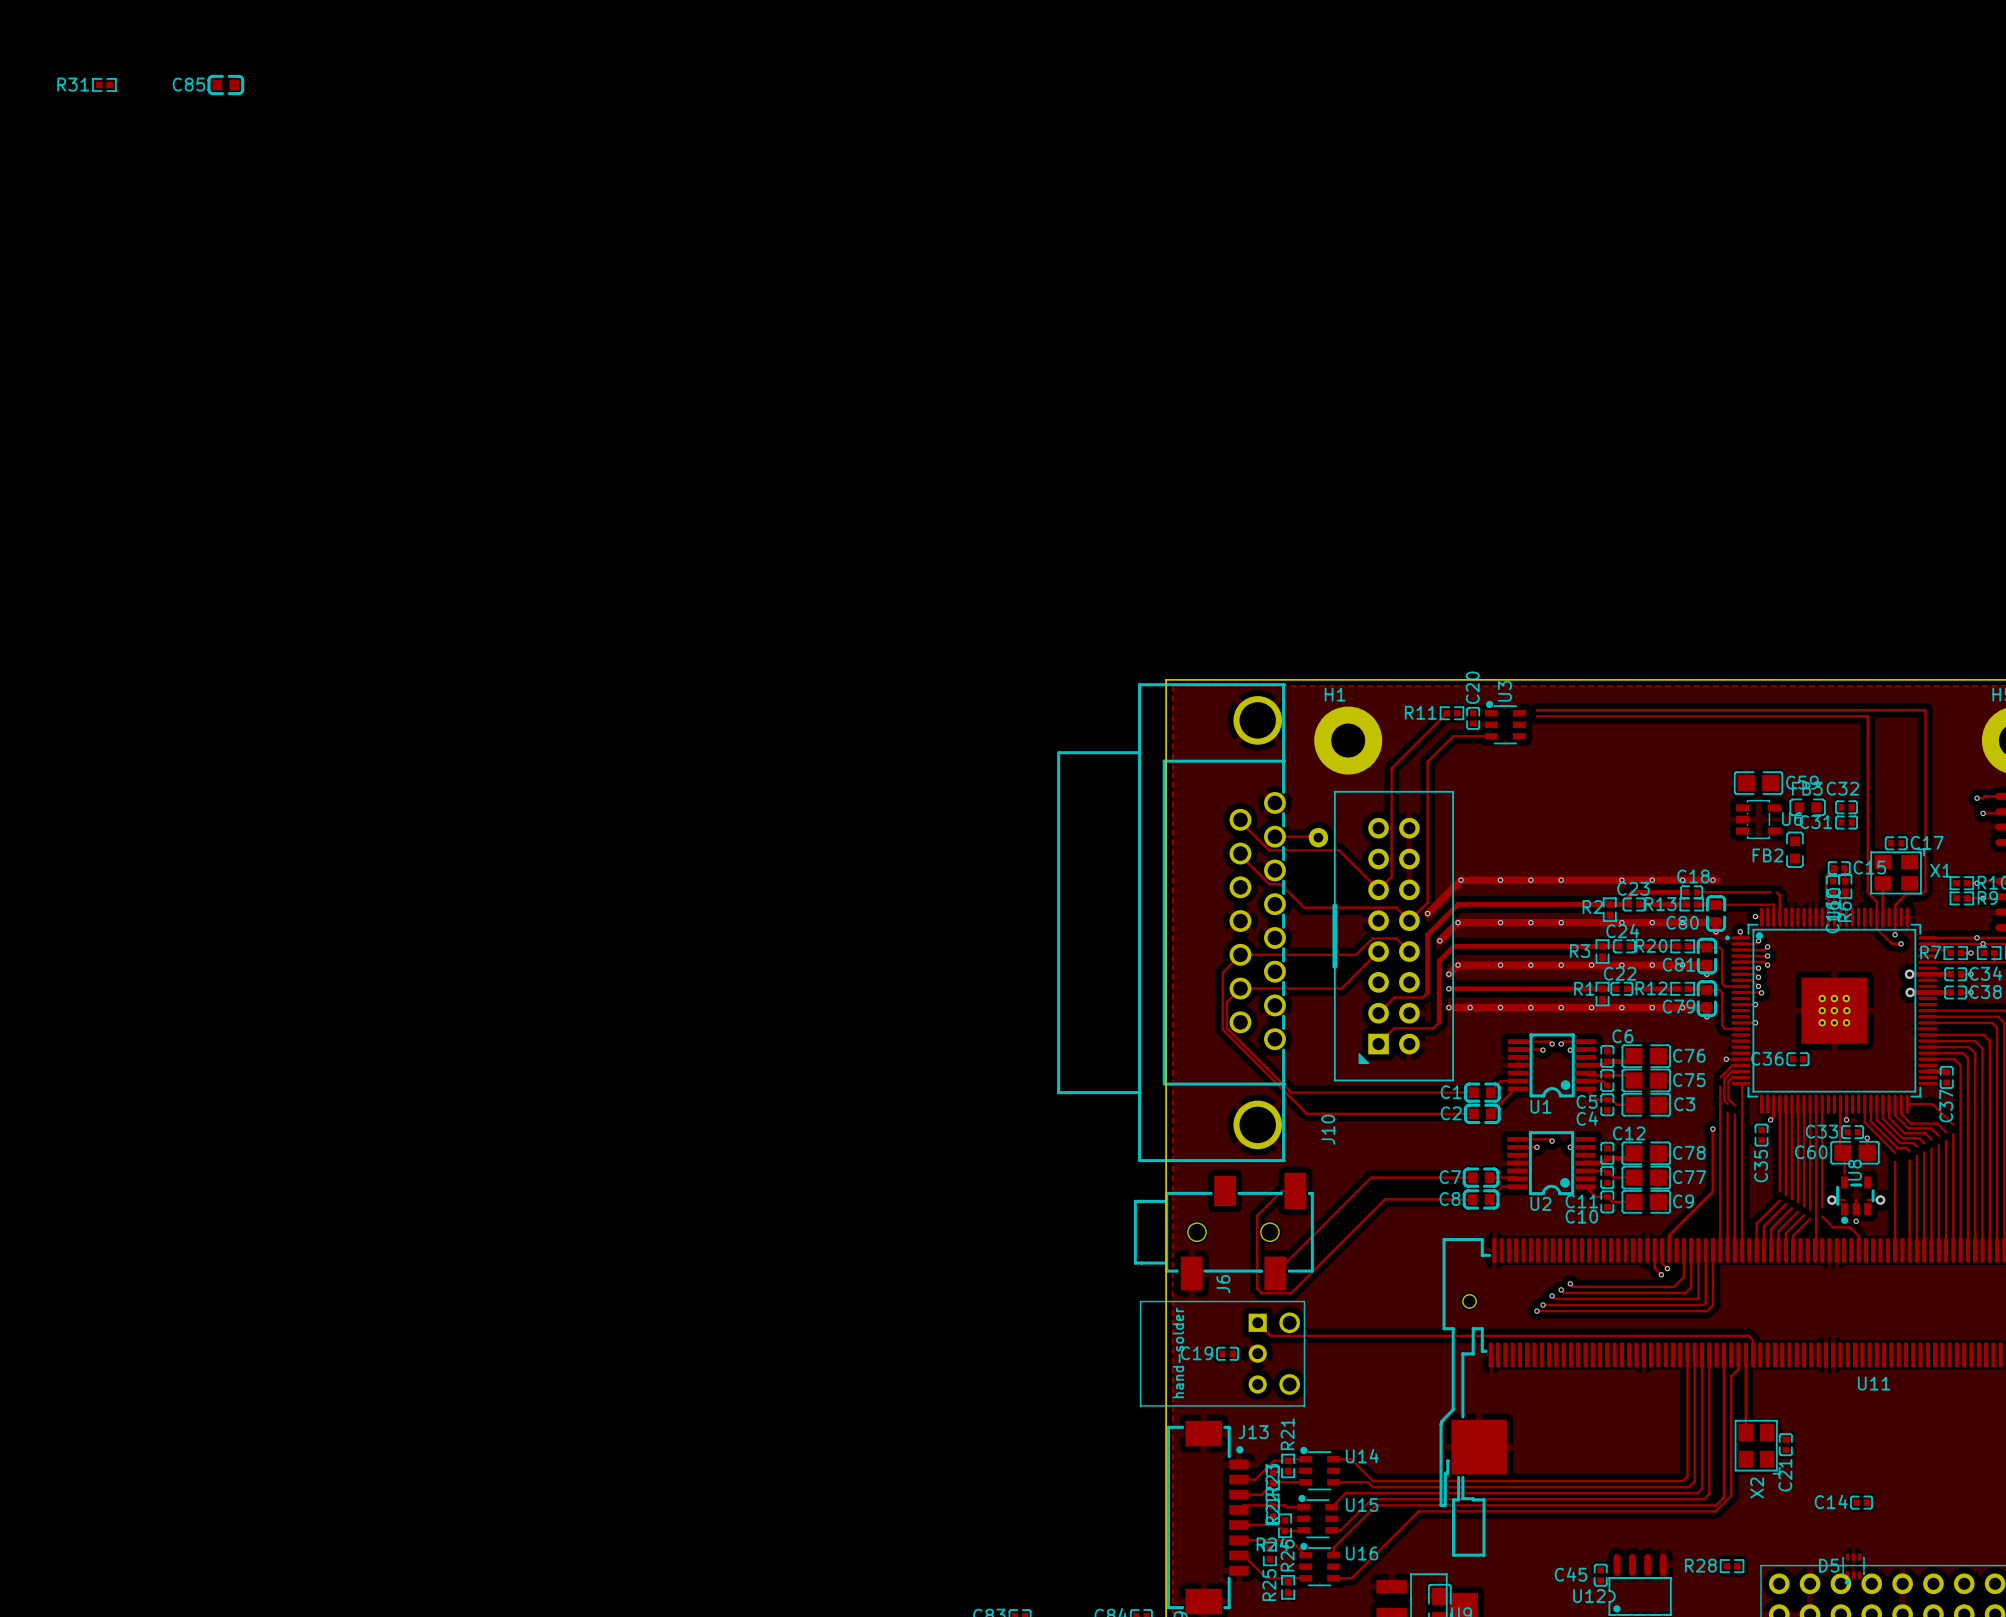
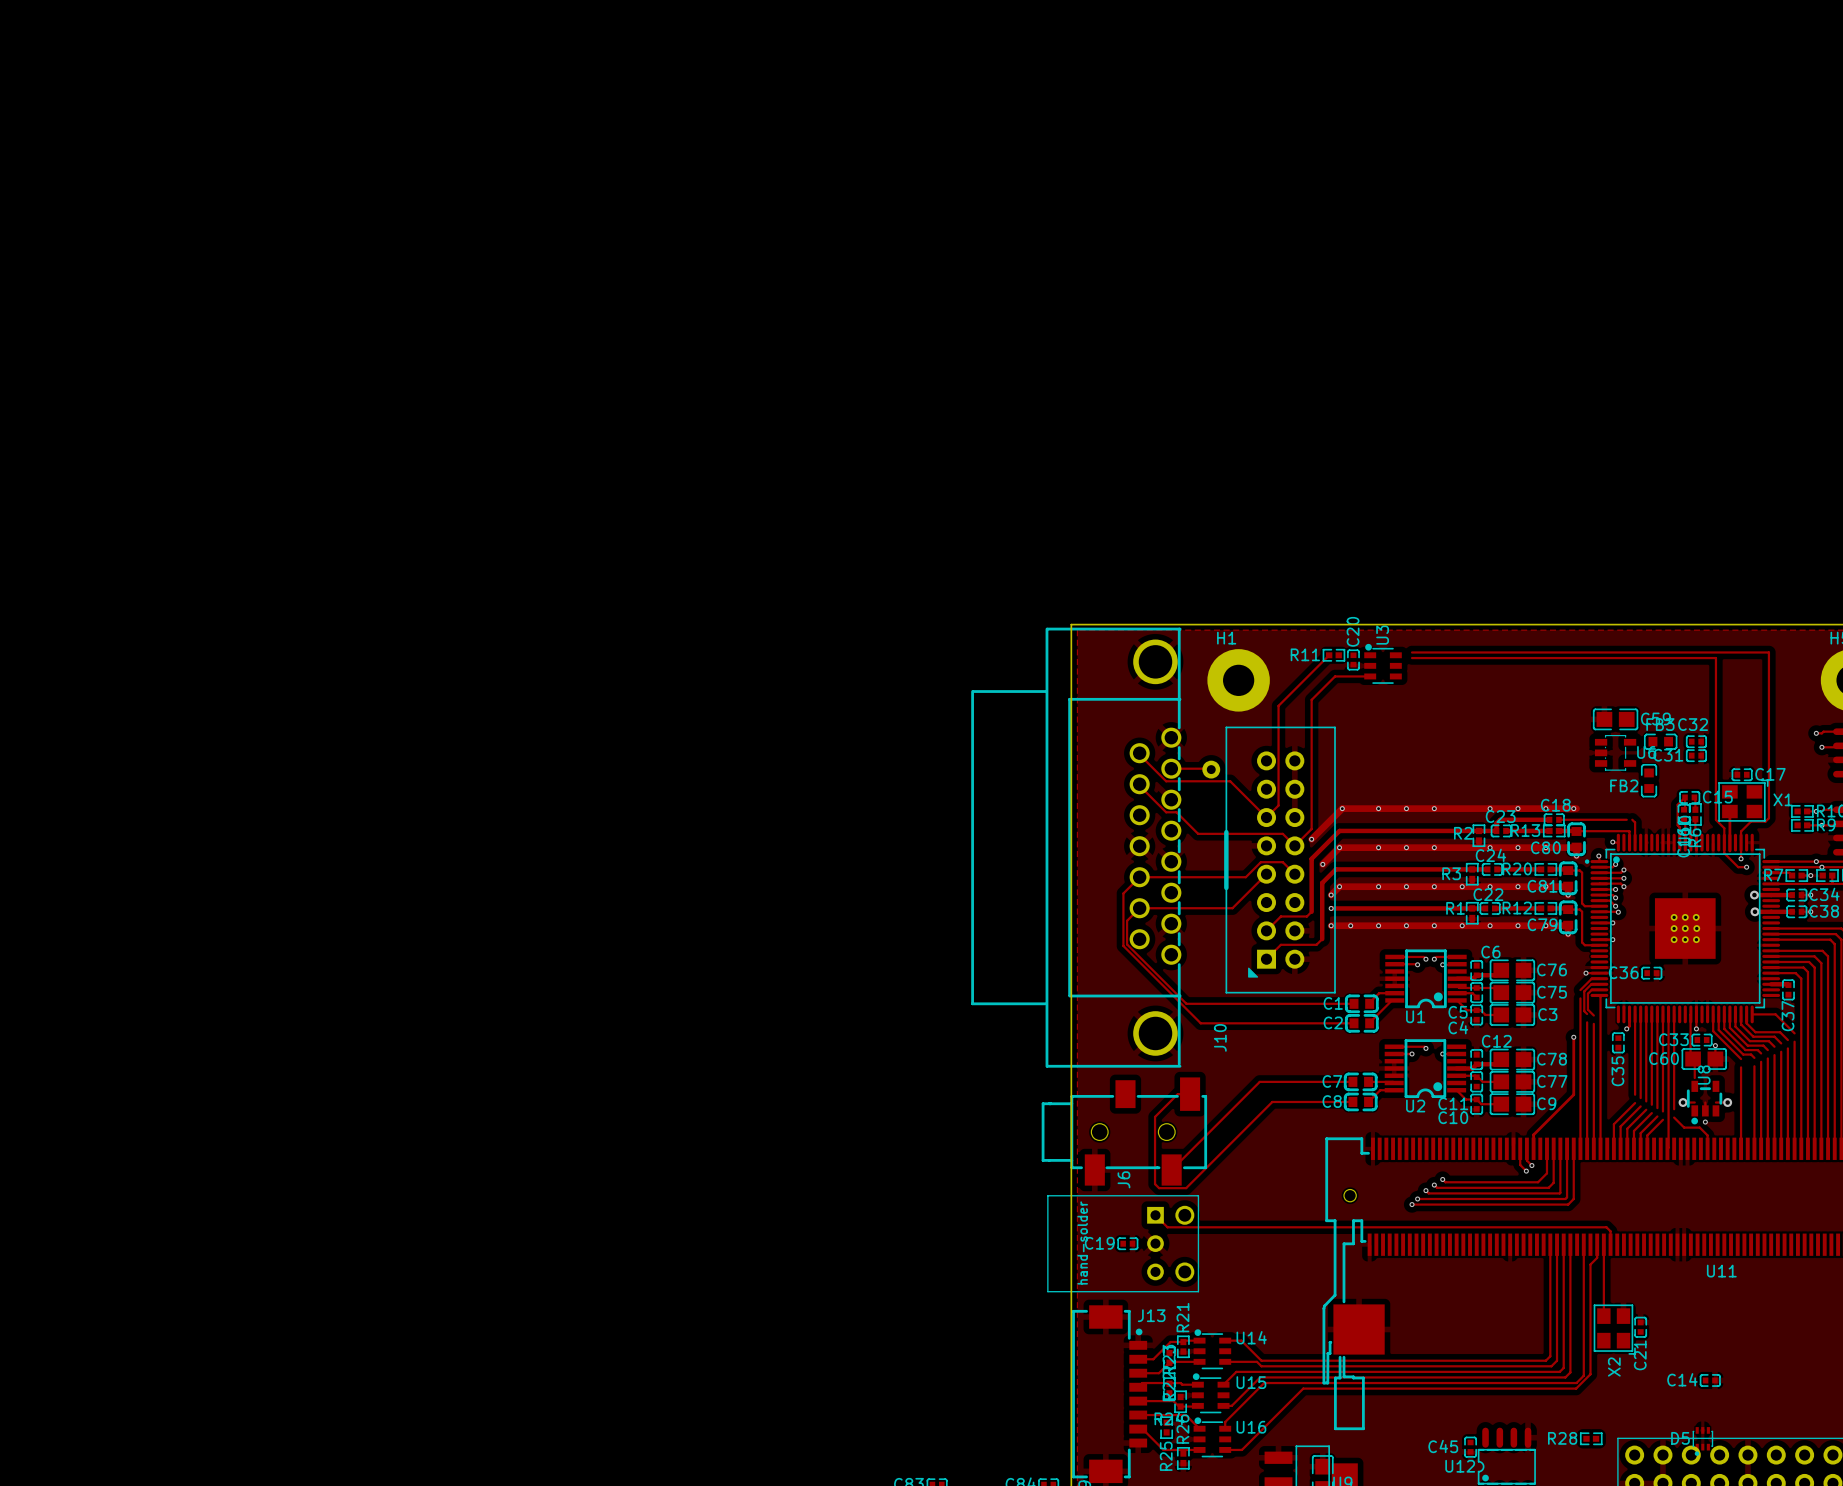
R31: (104, 84) -> none
C85: (225, 84) -> none

